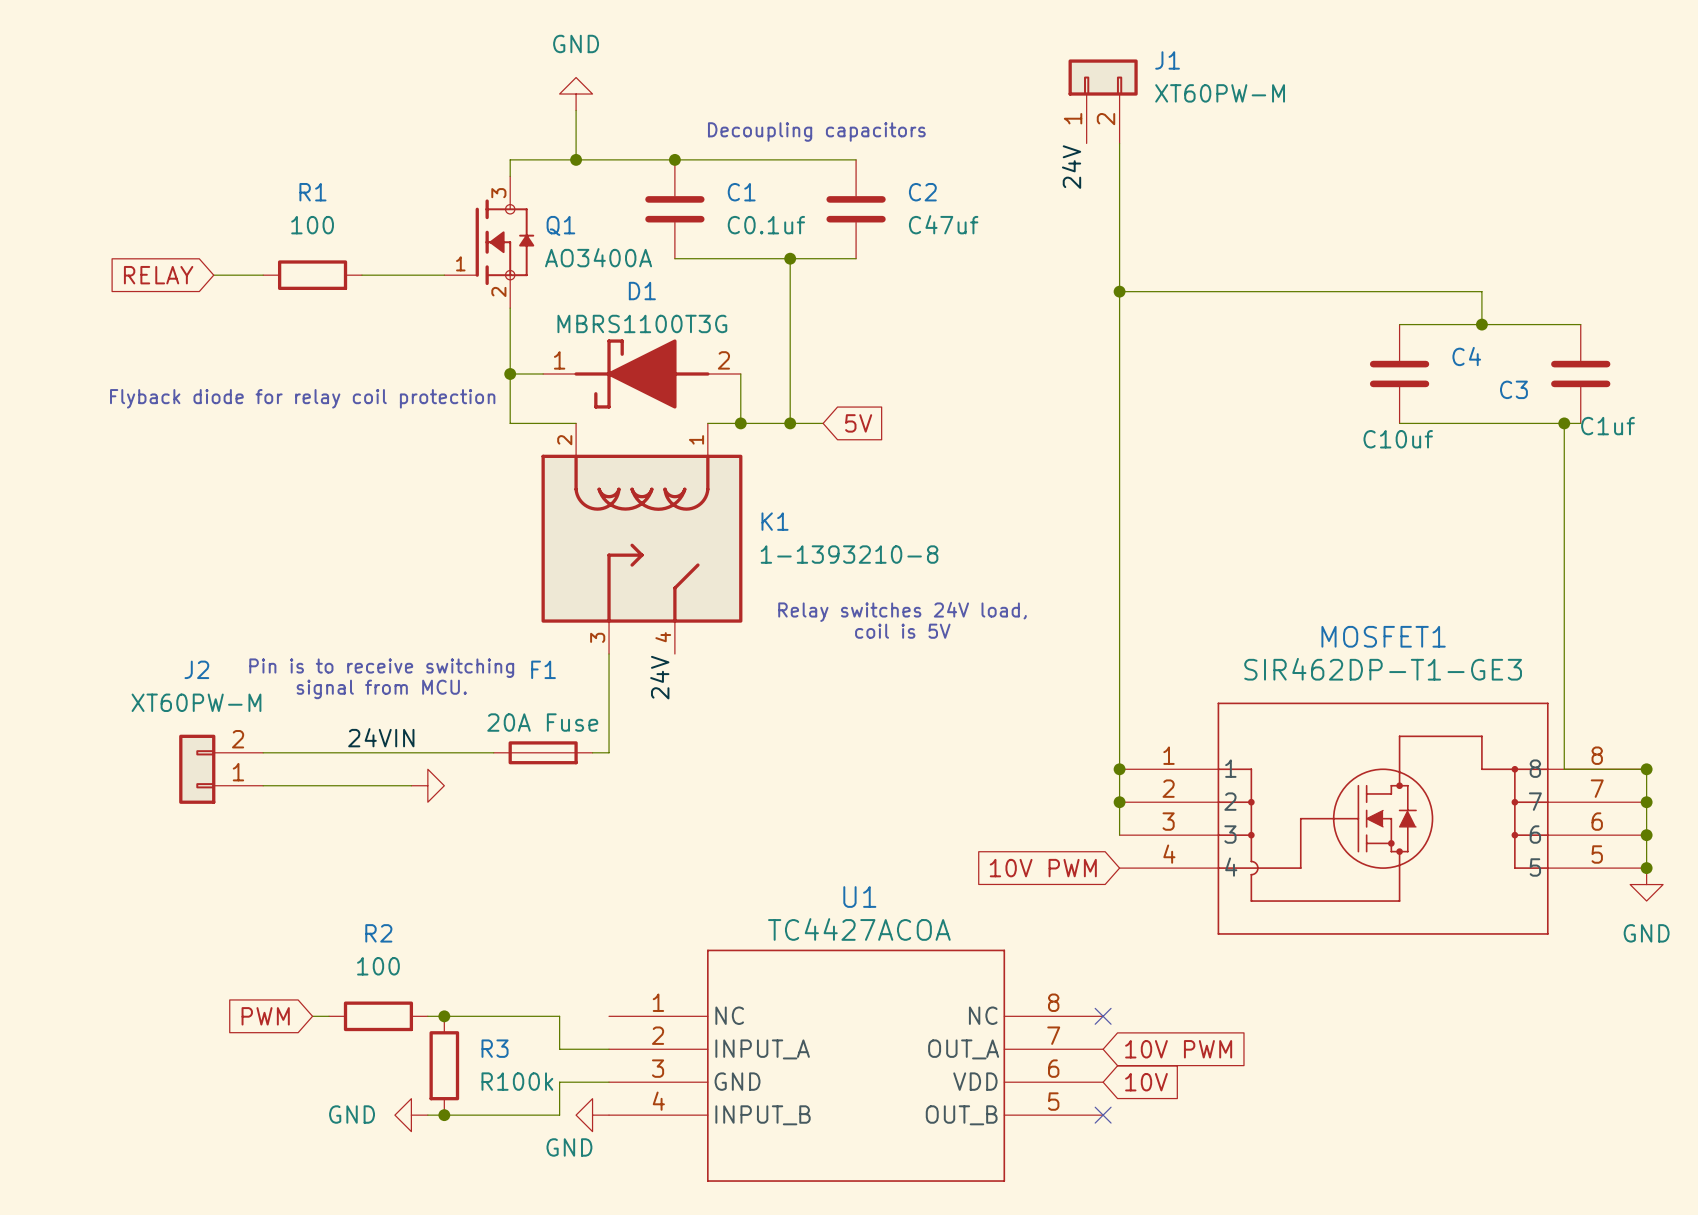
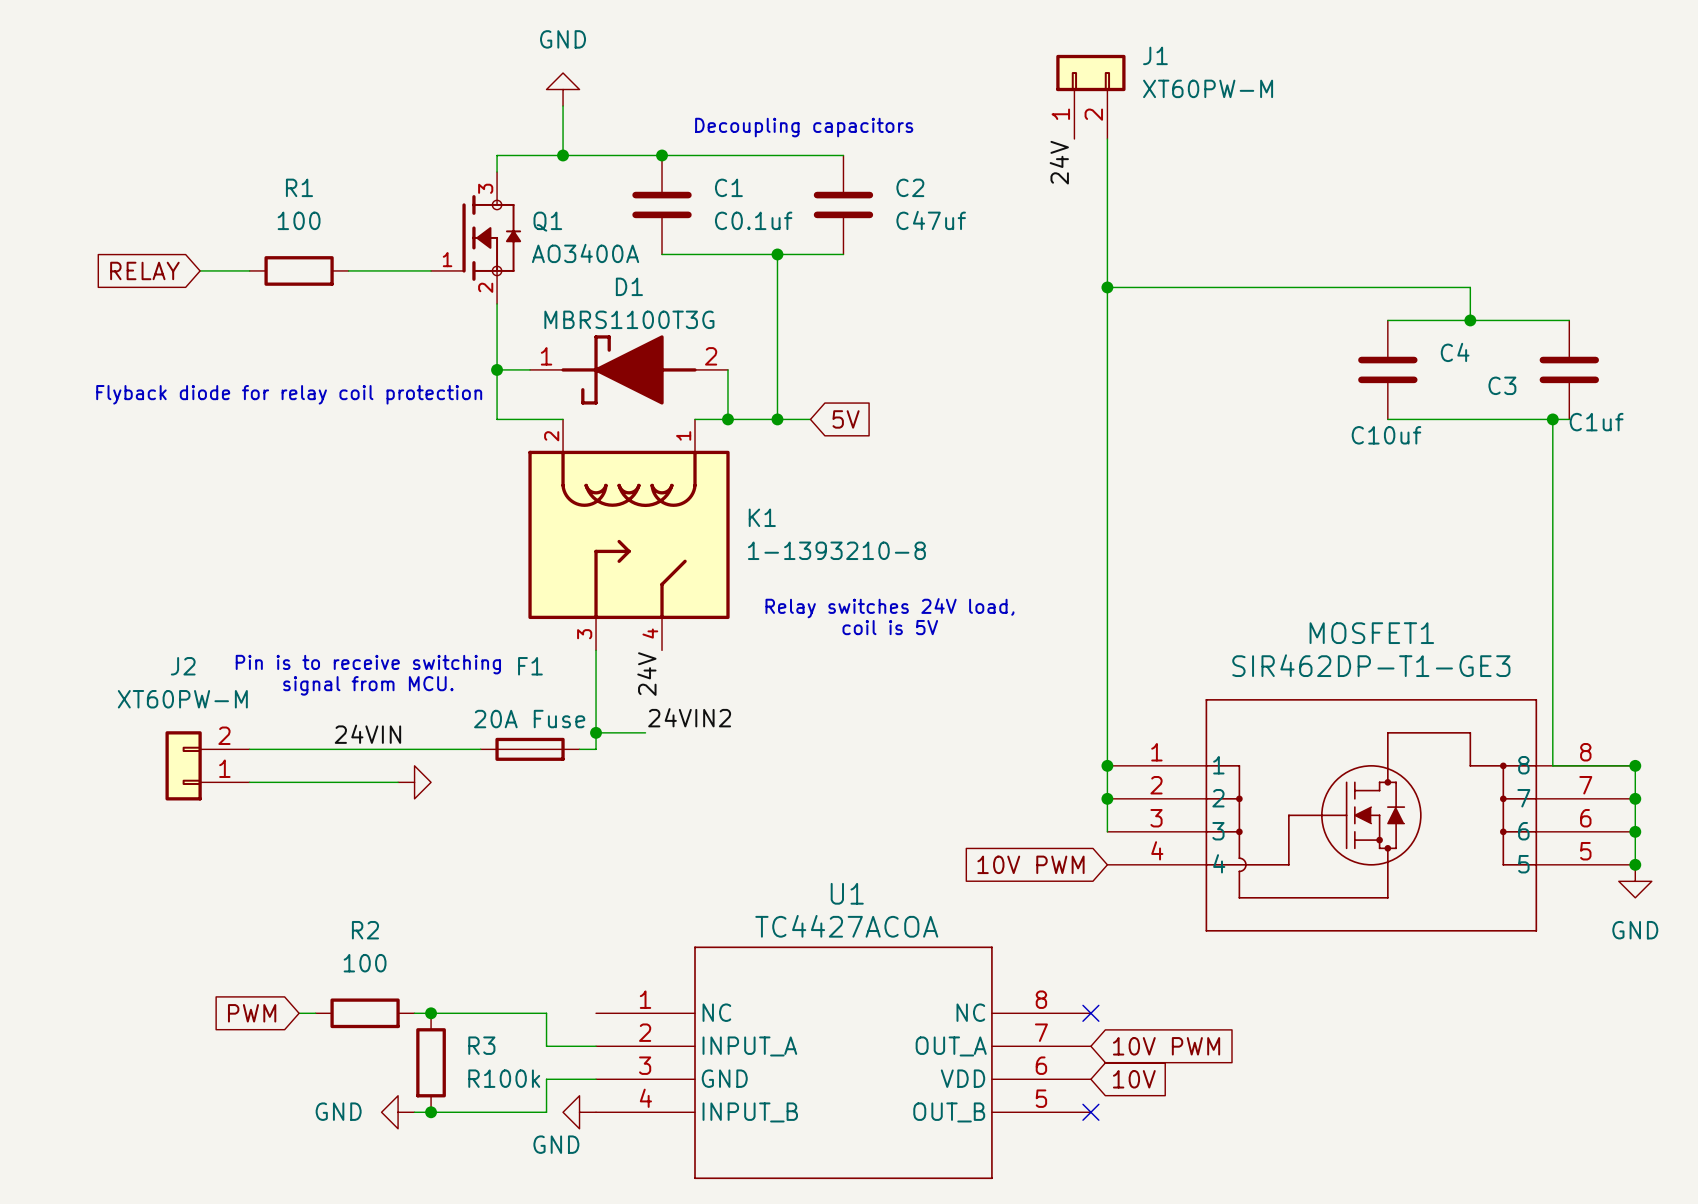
label: none -> 24VIN2 (689, 717)
wire: none -> (596, 732) (645, 732)
junction: none -> (596, 732)

